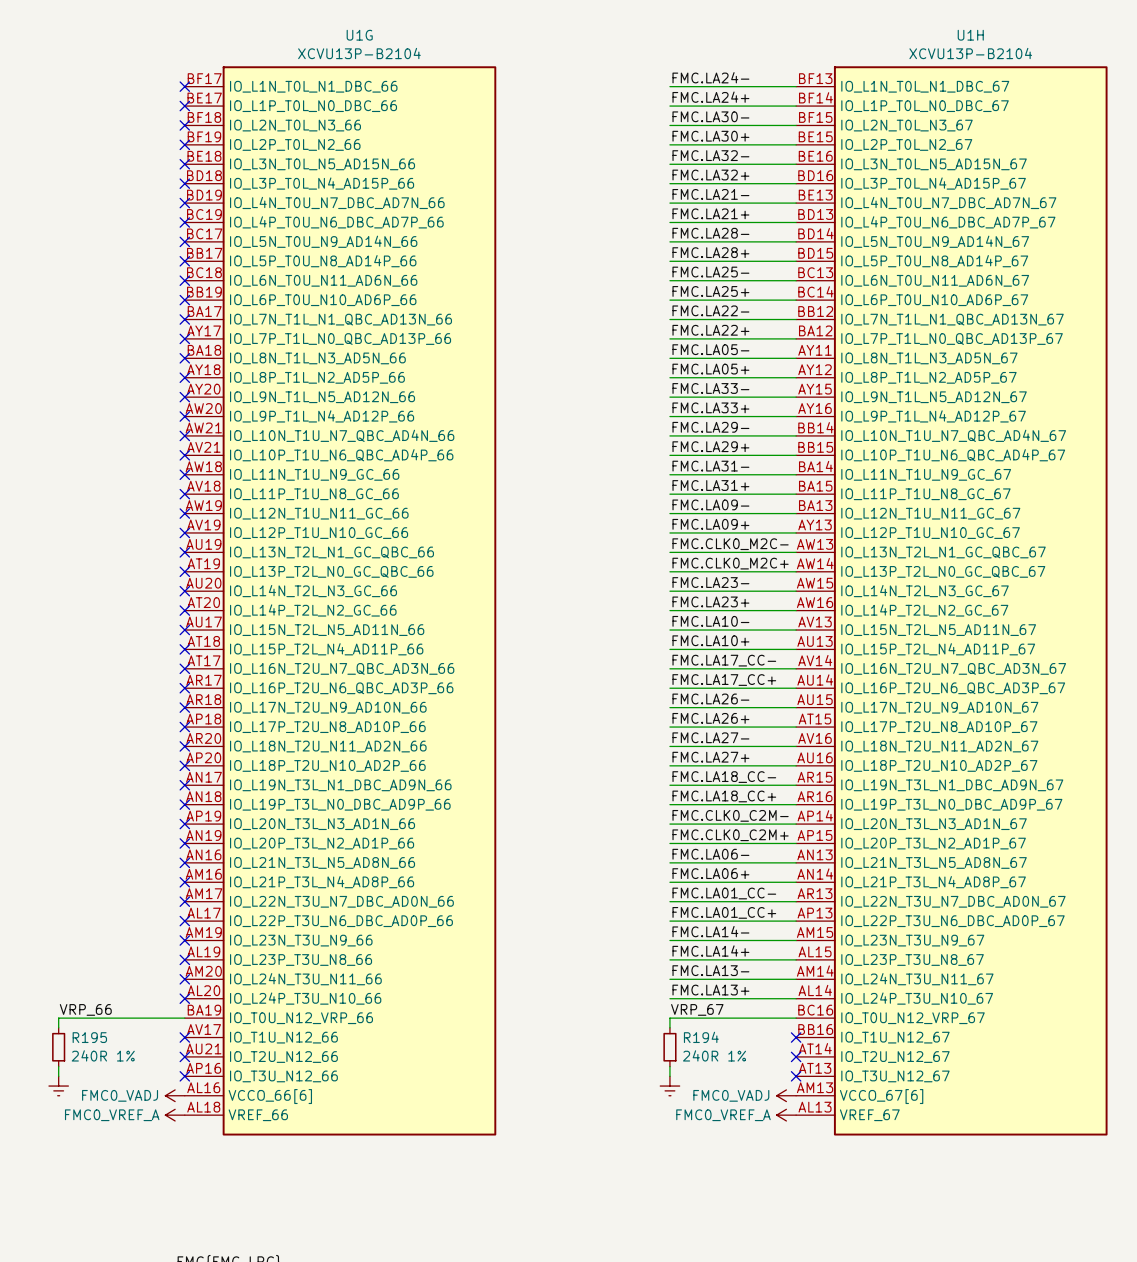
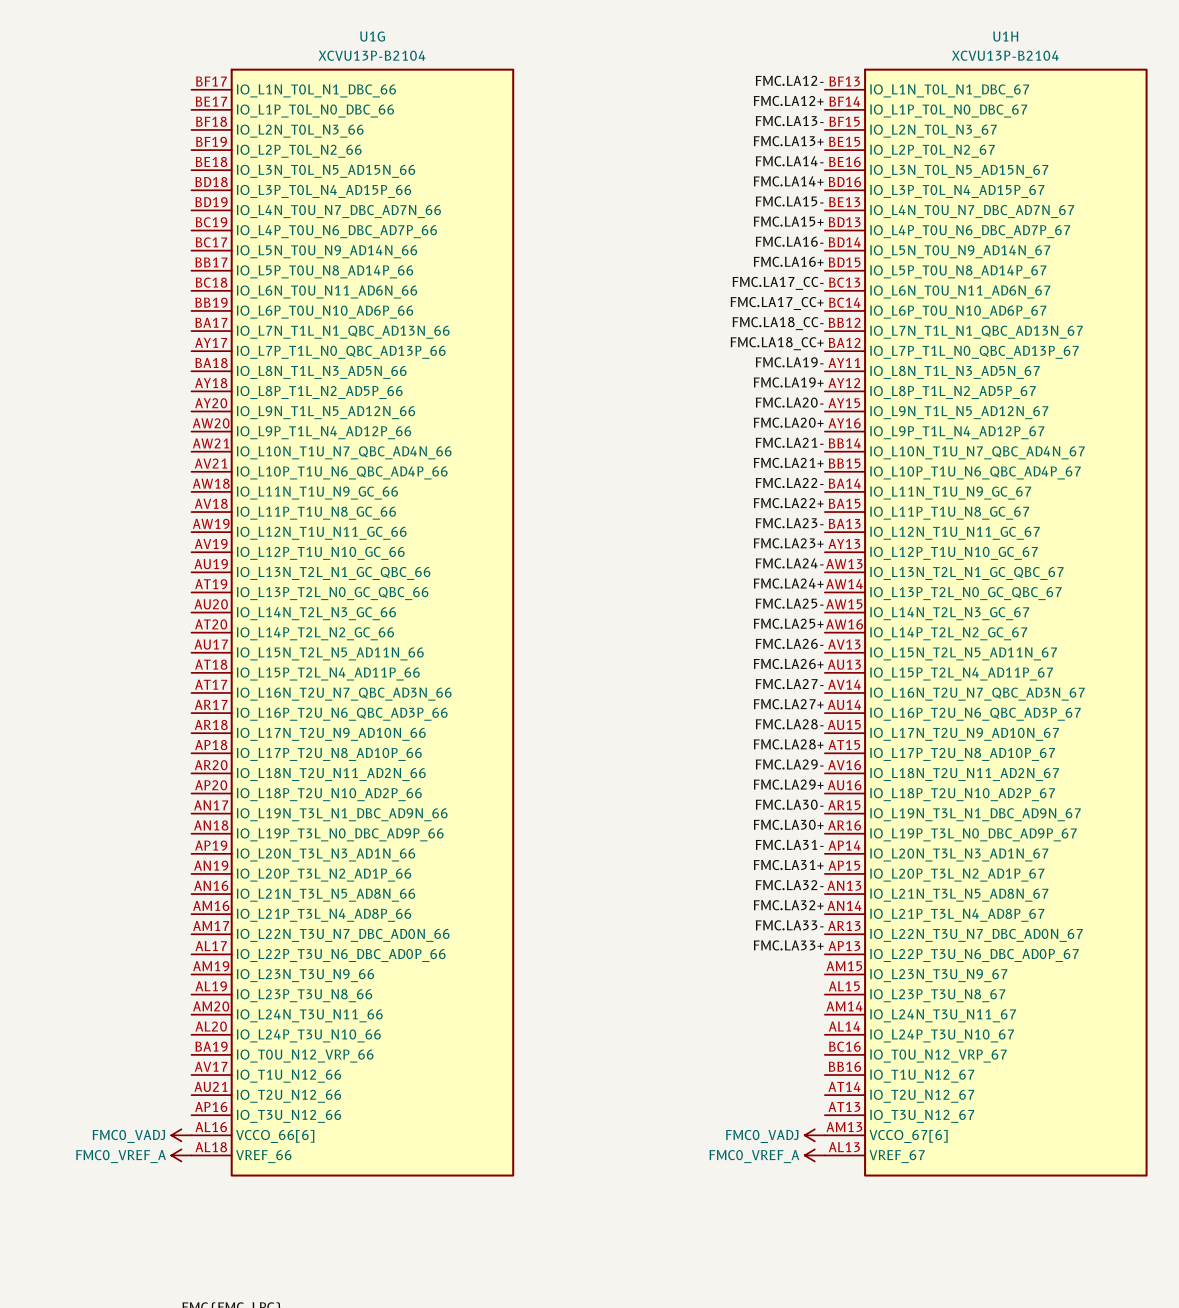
label: FMC.LA24- (710, 77) -> none
label: none -> FMC.LA12- (789, 80)
no-connect mark: (184, 86) -> none
wire: (669, 86) (796, 86) -> none
label: FMC.LA24+ (710, 97) -> none
label: none -> FMC.LA12+ (788, 100)
no-connect mark: (184, 106) -> none
wire: (669, 106) (796, 106) -> none
label: FMC.LA30- (710, 116) -> none
label: none -> FMC.LA13- (789, 121)
no-connect mark: (184, 125) -> none
wire: (669, 125) (796, 125) -> none
label: FMC.LA30+ (710, 136) -> none
label: none -> FMC.LA13+ (788, 141)
no-connect mark: (184, 144) -> none
wire: (669, 144) (796, 144) -> none
label: FMC.LA32- (710, 155) -> none
label: none -> FMC.LA14- (789, 161)
no-connect mark: (184, 164) -> none
wire: (669, 164) (796, 164) -> none
label: none -> FMC.LA14+ (788, 181)
label: FMC.LA32+ (710, 175) -> none
no-connect mark: (184, 183) -> none
wire: (669, 183) (796, 183) -> none
label: FMC.LA21- (710, 194) -> none
label: none -> FMC.LA15- (789, 201)
no-connect mark: (184, 203) -> none
wire: (669, 203) (796, 203) -> none
label: FMC.LA21+ (710, 213) -> none
label: none -> FMC.LA15+ (788, 221)
no-connect mark: (184, 222) -> none
wire: (669, 222) (796, 222) -> none
label: FMC.LA28- (710, 233) -> none
label: none -> FMC.LA16- (789, 241)
no-connect mark: (184, 241) -> none
wire: (669, 241) (796, 241) -> none
label: FMC.LA28+ (710, 252) -> none
label: none -> FMC.LA16+ (788, 261)
no-connect mark: (184, 261) -> none
wire: (669, 261) (796, 261) -> none
label: FMC.LA25- (710, 272) -> none
label: none -> FMC.LA17_CC- (778, 283)
no-connect mark: (184, 280) -> none
wire: (669, 280) (796, 280) -> none
label: FMC.LA25+ (710, 291) -> FMC.LA17_CC+ (777, 303)
no-connect mark: (184, 300) -> none
wire: (669, 300) (796, 300) -> none
label: FMC.LA22- (710, 310) -> FMC.LA18_CC- (778, 323)
no-connect mark: (184, 319) -> none
wire: (669, 319) (796, 319) -> none
label: FMC.LA22+ (710, 330) -> none
label: none -> FMC.LA18_CC+ (777, 343)
no-connect mark: (184, 338) -> none
wire: (669, 338) (796, 338) -> none
label: FMC.LA05- (710, 349) -> none
label: none -> FMC.LA19- (789, 362)
no-connect mark: (184, 358) -> none
wire: (669, 358) (796, 358) -> none
label: FMC.LA05+ (710, 369) -> none
label: none -> FMC.LA19+ (788, 382)
no-connect mark: (184, 377) -> none
wire: (669, 377) (796, 377) -> none
label: FMC.LA33- (710, 388) -> none
label: none -> FMC.LA20- (789, 402)
no-connect mark: (184, 397) -> none
wire: (669, 397) (796, 397) -> none
label: FMC.LA33+ (710, 407) -> none
label: none -> FMC.LA20+ (788, 422)
no-connect mark: (184, 416) -> none
wire: (669, 416) (796, 416) -> none
label: FMC.LA29- (710, 427) -> none
label: none -> FMC.LA21- (789, 442)
no-connect mark: (184, 435) -> none
wire: (669, 435) (796, 435) -> none
label: FMC.LA29+ (710, 446) -> none
label: none -> FMC.LA21+ (788, 462)
no-connect mark: (184, 455) -> none
wire: (669, 455) (796, 455) -> none
label: FMC.LA31- (710, 466) -> none
label: none -> FMC.LA22- (789, 482)
no-connect mark: (184, 474) -> none
wire: (669, 474) (796, 474) -> none
label: FMC.LA31+ (710, 485) -> none
label: none -> FMC.LA22+ (788, 503)
no-connect mark: (184, 494) -> none
wire: (669, 494) (796, 494) -> none
label: FMC.LA09- (710, 504) -> none
no-connect mark: (184, 513) -> none
wire: (669, 513) (796, 513) -> none
label: FMC.LA09+ (710, 524) -> none
no-connect mark: (184, 532) -> none
wire: (669, 532) (796, 532) -> none
label: none -> FMC.LA24- (789, 563)
label: FMC.CLK0_M2C- (730, 544) -> none
no-connect mark: (184, 552) -> none
wire: (669, 552) (796, 552) -> none
label: FMC.CLK0_M2C+ (730, 563) -> FMC.LA24+ (788, 583)
no-connect mark: (184, 571) -> none
wire: (669, 571) (796, 571) -> none
label position: FMC.LA23- (710, 582) -> FMC.LA23- (789, 523)
label: none -> FMC.LA25- (789, 603)
no-connect mark: (184, 591) -> none
wire: (669, 591) (796, 591) -> none
label position: FMC.LA23+ (710, 601) -> FMC.LA23+ (788, 543)
no-connect mark: (184, 610) -> none
wire: (669, 610) (796, 610) -> none
label: FMC.LA10- (710, 621) -> FMC.LA25+ (788, 623)
no-connect mark: (184, 630) -> none
wire: (669, 630) (796, 630) -> none
label: FMC.LA10+ (710, 640) -> none
no-connect mark: (184, 649) -> none
wire: (669, 649) (796, 649) -> none
label: FMC.LA17_CC- (724, 660) -> none
no-connect mark: (184, 668) -> none
wire: (669, 668) (796, 668) -> none
label: FMC.LA17_CC+ (724, 680) -> none
no-connect mark: (184, 688) -> none
wire: (669, 688) (796, 688) -> none
label position: FMC.LA26- (710, 698) -> FMC.LA26- (789, 643)
label: none -> FMC.LA28- (789, 724)
no-connect mark: (184, 707) -> none
wire: (669, 707) (796, 707) -> none
label position: FMC.LA26+ (710, 718) -> FMC.LA26+ (788, 663)
label: none -> FMC.LA28+ (788, 744)
no-connect mark: (184, 727) -> none
wire: (669, 727) (796, 727) -> none
label position: FMC.LA27- (710, 737) -> FMC.LA27- (789, 684)
label: none -> FMC.LA29- (789, 764)
no-connect mark: (184, 746) -> none
wire: (669, 746) (796, 746) -> none
label position: FMC.LA27+ (710, 757) -> FMC.LA27+ (788, 704)
label: none -> FMC.LA29+ (788, 784)
no-connect mark: (184, 765) -> none
wire: (669, 765) (796, 765) -> none
label: FMC.LA18_CC- (724, 777) -> FMC.LA30- (789, 804)
no-connect mark: (184, 785) -> none
wire: (669, 785) (796, 785) -> none
label: FMC.LA18_CC+ (724, 796) -> none
label: none -> FMC.LA30+ (788, 824)
no-connect mark: (184, 804) -> none
wire: (669, 804) (796, 804) -> none
label: FMC.CLK0_C2M- (730, 815) -> none
label: none -> FMC.LA31- (789, 844)
no-connect mark: (184, 824) -> none
wire: (669, 824) (796, 824) -> none
label: none -> FMC.LA31+ (788, 865)
label: FMC.CLK0_C2M+ (730, 835) -> none
no-connect mark: (184, 843) -> none
wire: (669, 843) (796, 843) -> none
label: FMC.LA06- (710, 854) -> none
label: none -> FMC.LA32- (789, 885)
no-connect mark: (184, 862) -> none
wire: (669, 862) (796, 862) -> none
label: FMC.LA06+ (710, 873) -> none
label: none -> FMC.LA32+ (788, 905)
no-connect mark: (184, 882) -> none
wire: (669, 882) (796, 882) -> none
label: FMC.LA01_CC- (724, 893) -> none
label: none -> FMC.LA33- (789, 925)
no-connect mark: (184, 901) -> none
wire: (669, 901) (796, 901) -> none
label: FMC.LA01_CC+ (724, 912) -> none
label: none -> FMC.LA33+ (788, 945)
no-connect mark: (184, 921) -> none
wire: (669, 921) (796, 921) -> none
label: FMC.LA14- (710, 931) -> none
no-connect mark: (184, 940) -> none
wire: (669, 940) (796, 940) -> none
label: FMC.LA14+ (710, 951) -> none
no-connect mark: (184, 959) -> none
wire: (669, 959) (796, 959) -> none
label: FMC.LA13- (710, 970) -> none
no-connect mark: (184, 979) -> none
wire: (669, 979) (796, 979) -> none
label: FMC.LA13+ (710, 990) -> none
no-connect mark: (184, 998) -> none
wire: (669, 998) (796, 998) -> none
label: VRP_66 (85, 1009) -> none
label: VRP_67 (697, 1009) -> none
wire: (184, 1018) (58, 1018) (58, 1027) -> none
wire: (796, 1018) (669, 1018) (669, 1027) -> none
no-connect mark: (184, 1037) -> none
no-connect mark: (796, 1037) -> none
R195: 240R 1% (58, 1047) -> none
R194: 240R 1% (669, 1047) -> none
no-connect mark: (184, 1056) -> none
no-connect mark: (796, 1056) -> none
wire: (58, 1066) (58, 1076) -> none
wire: (669, 1066) (669, 1076) -> none
no-connect mark: (184, 1076) -> none
no-connect mark: (796, 1076) -> none
power symbol: (58, 1086) -> none
power symbol: (669, 1086) -> none

